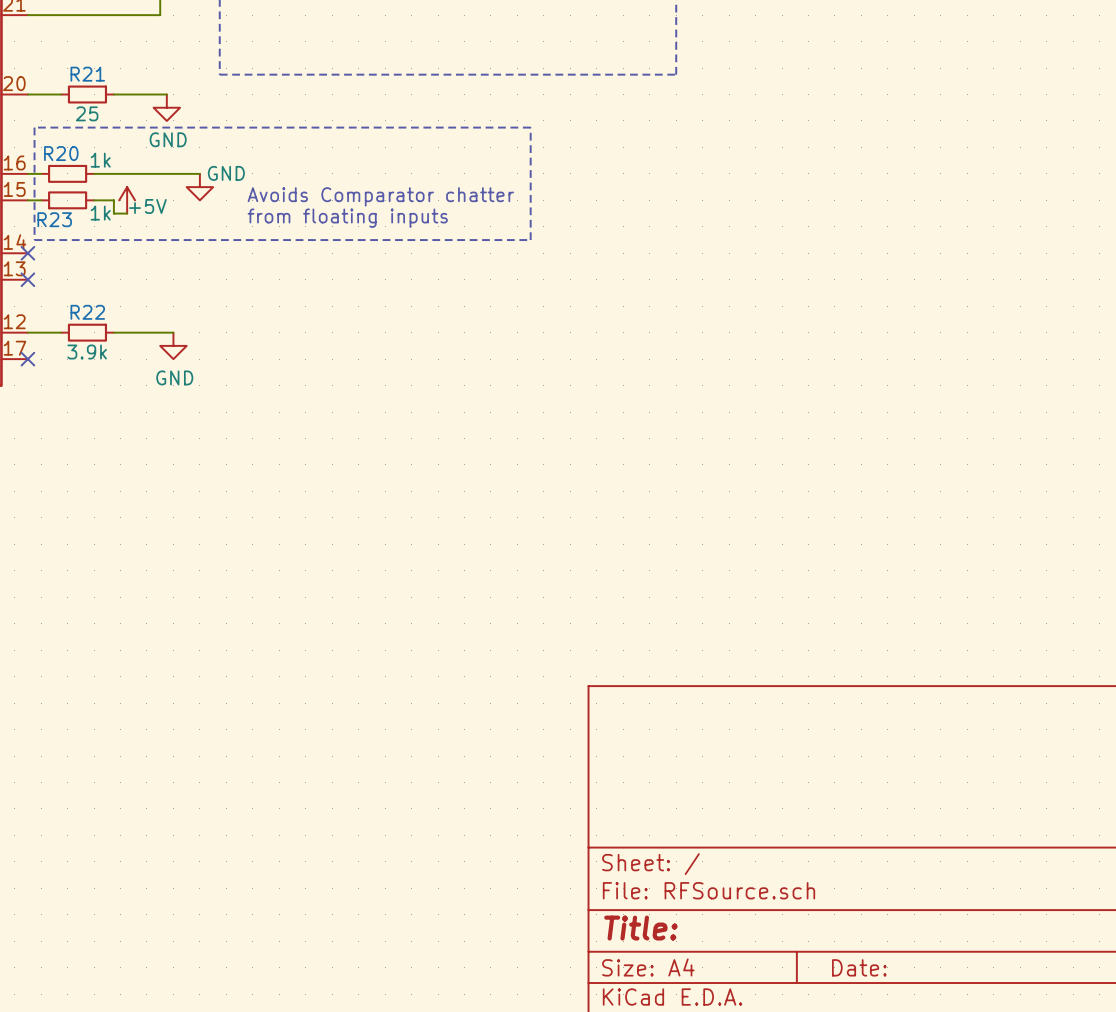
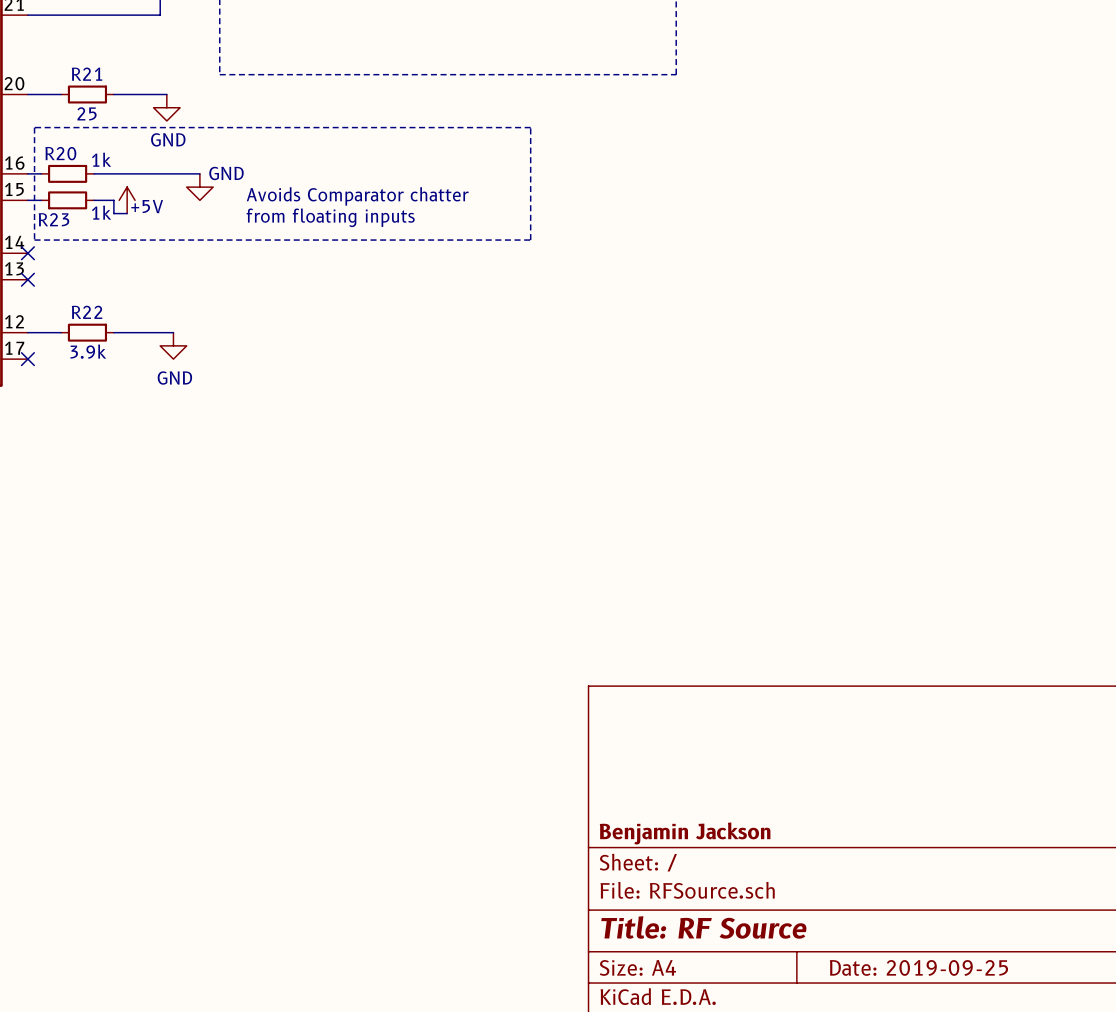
title block: none -> Benjamin Jackson (685, 833)
title block: Title: (640, 928) -> Title: RF Source (703, 927)
title block: Date: (859, 967) -> Date: 2019-09-25 (918, 967)

